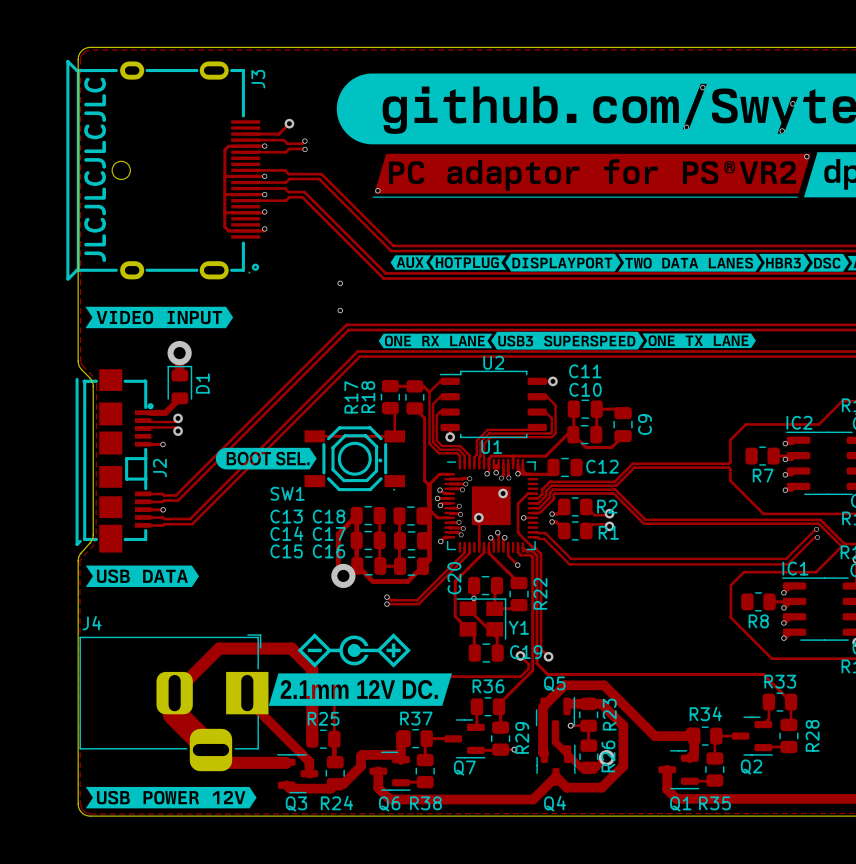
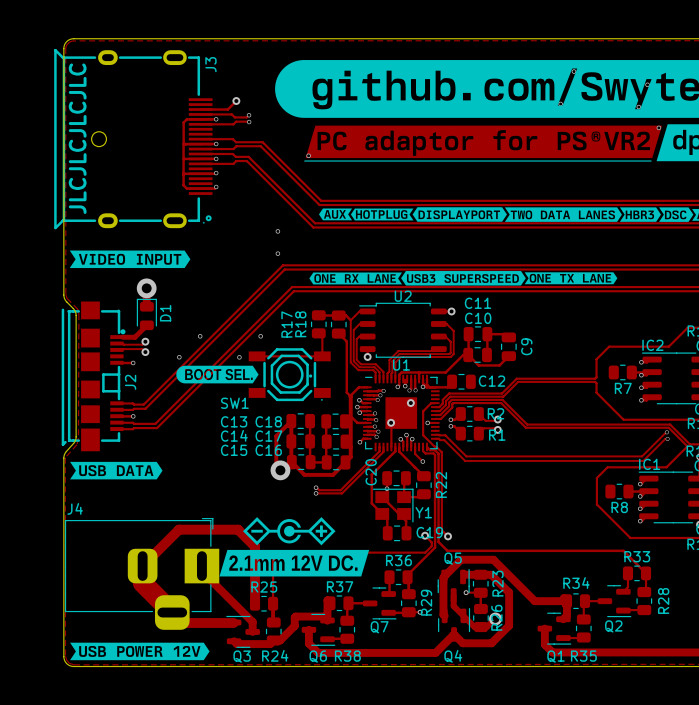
via: none -> (200, 336)
via: none -> (260, 336)
via: none -> (179, 357)
via: none -> (239, 357)

